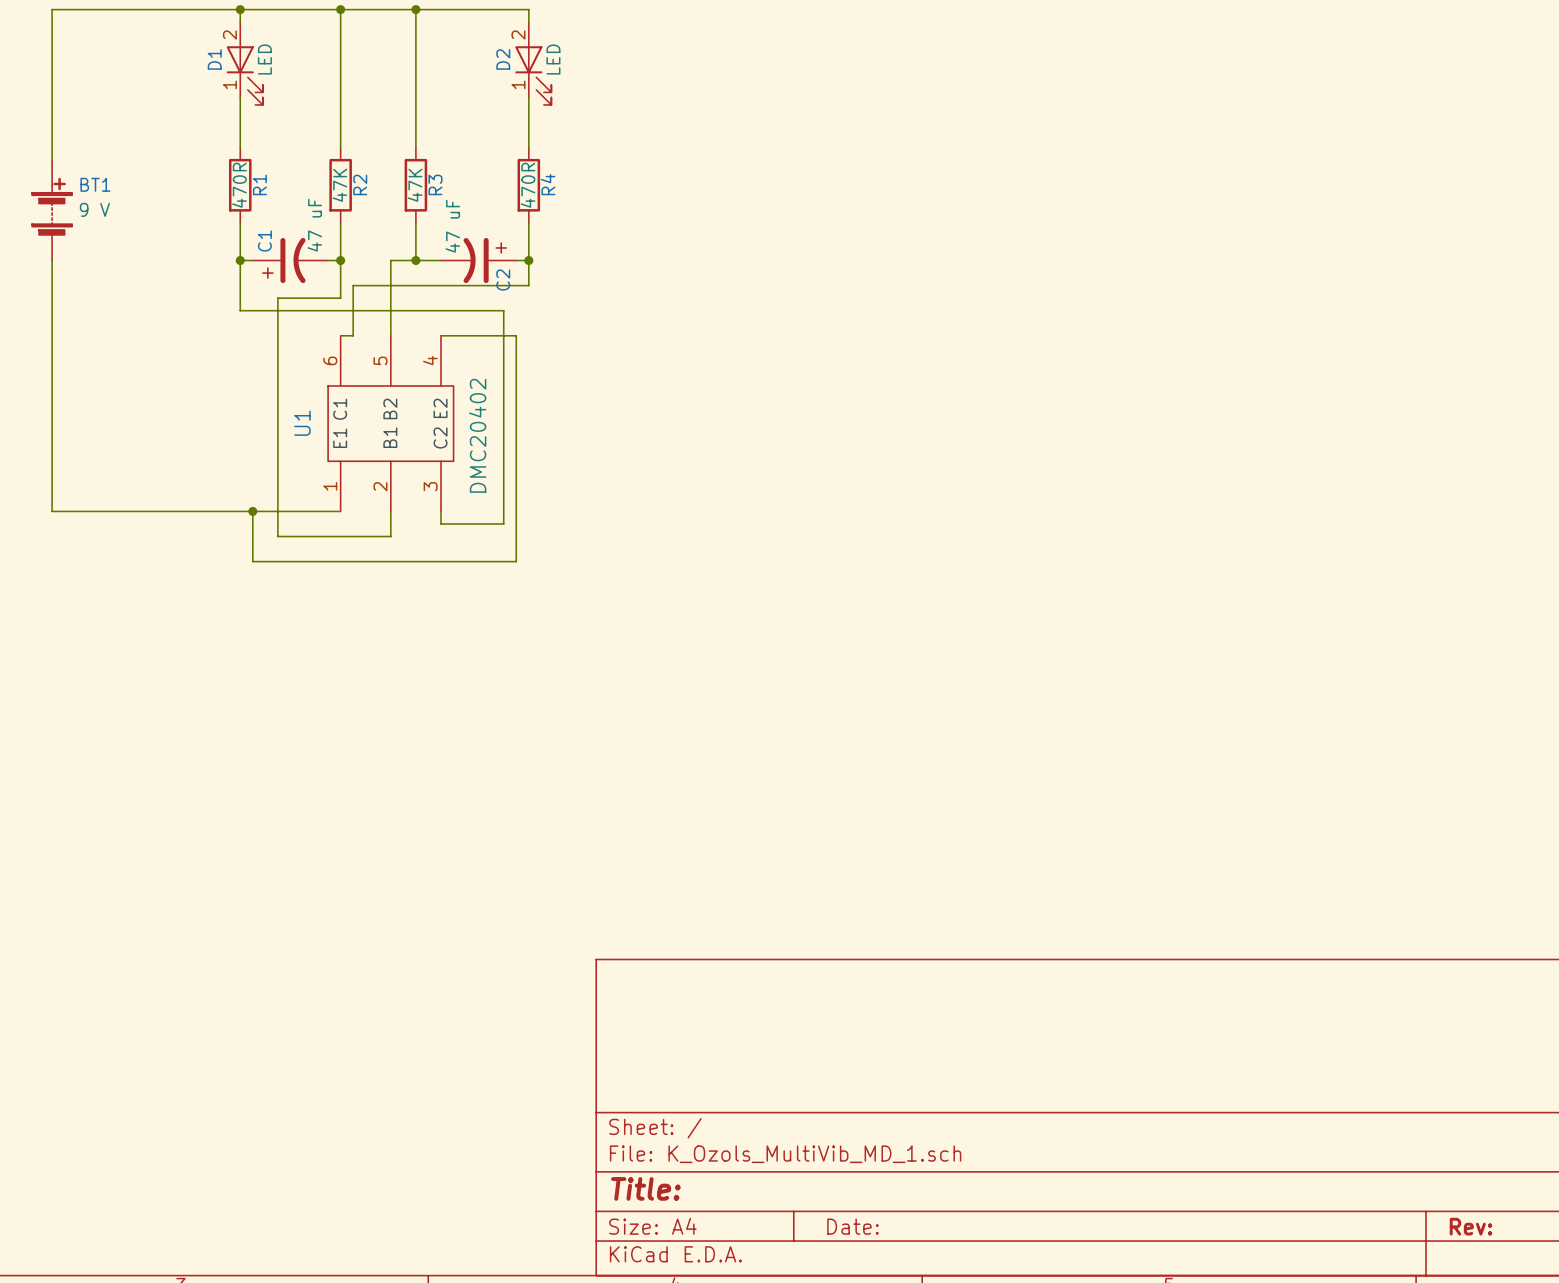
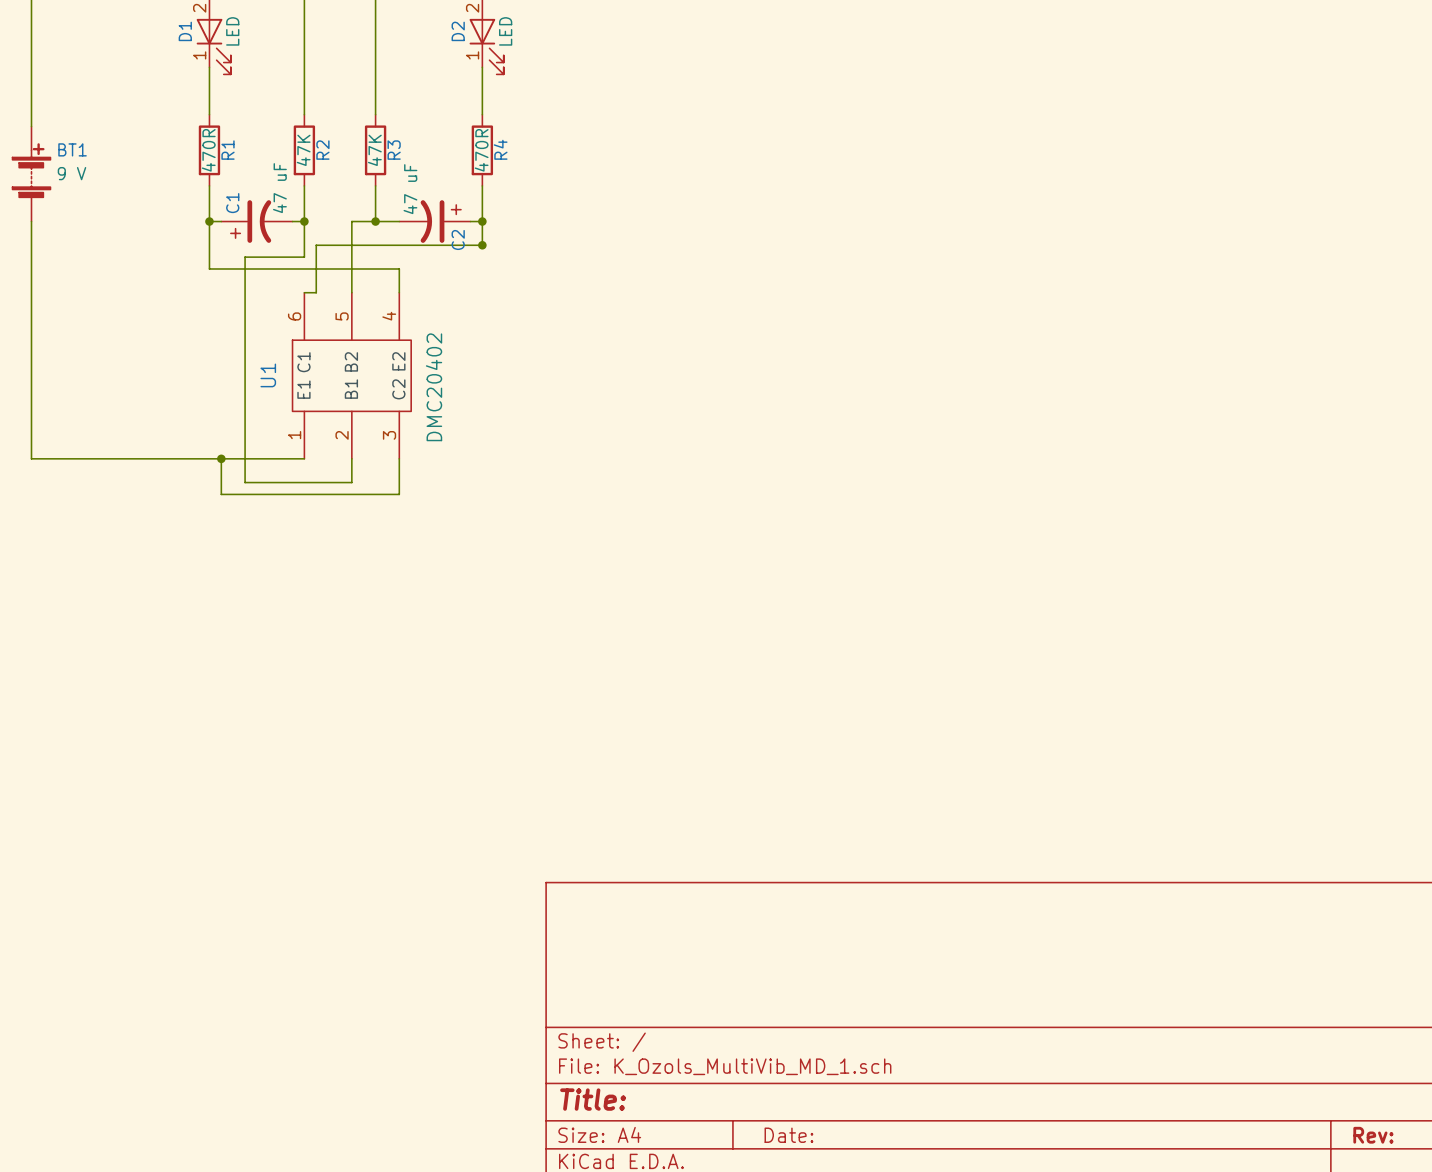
junction: none -> (482, 245)
wire: (441, 310) (503, 310) (503, 523) (441, 523) -> (399, 268) (399, 292)
wire: (441, 335) (516, 335) (516, 561) (252, 561) (252, 549) -> (399, 470) (399, 494) (221, 494)

